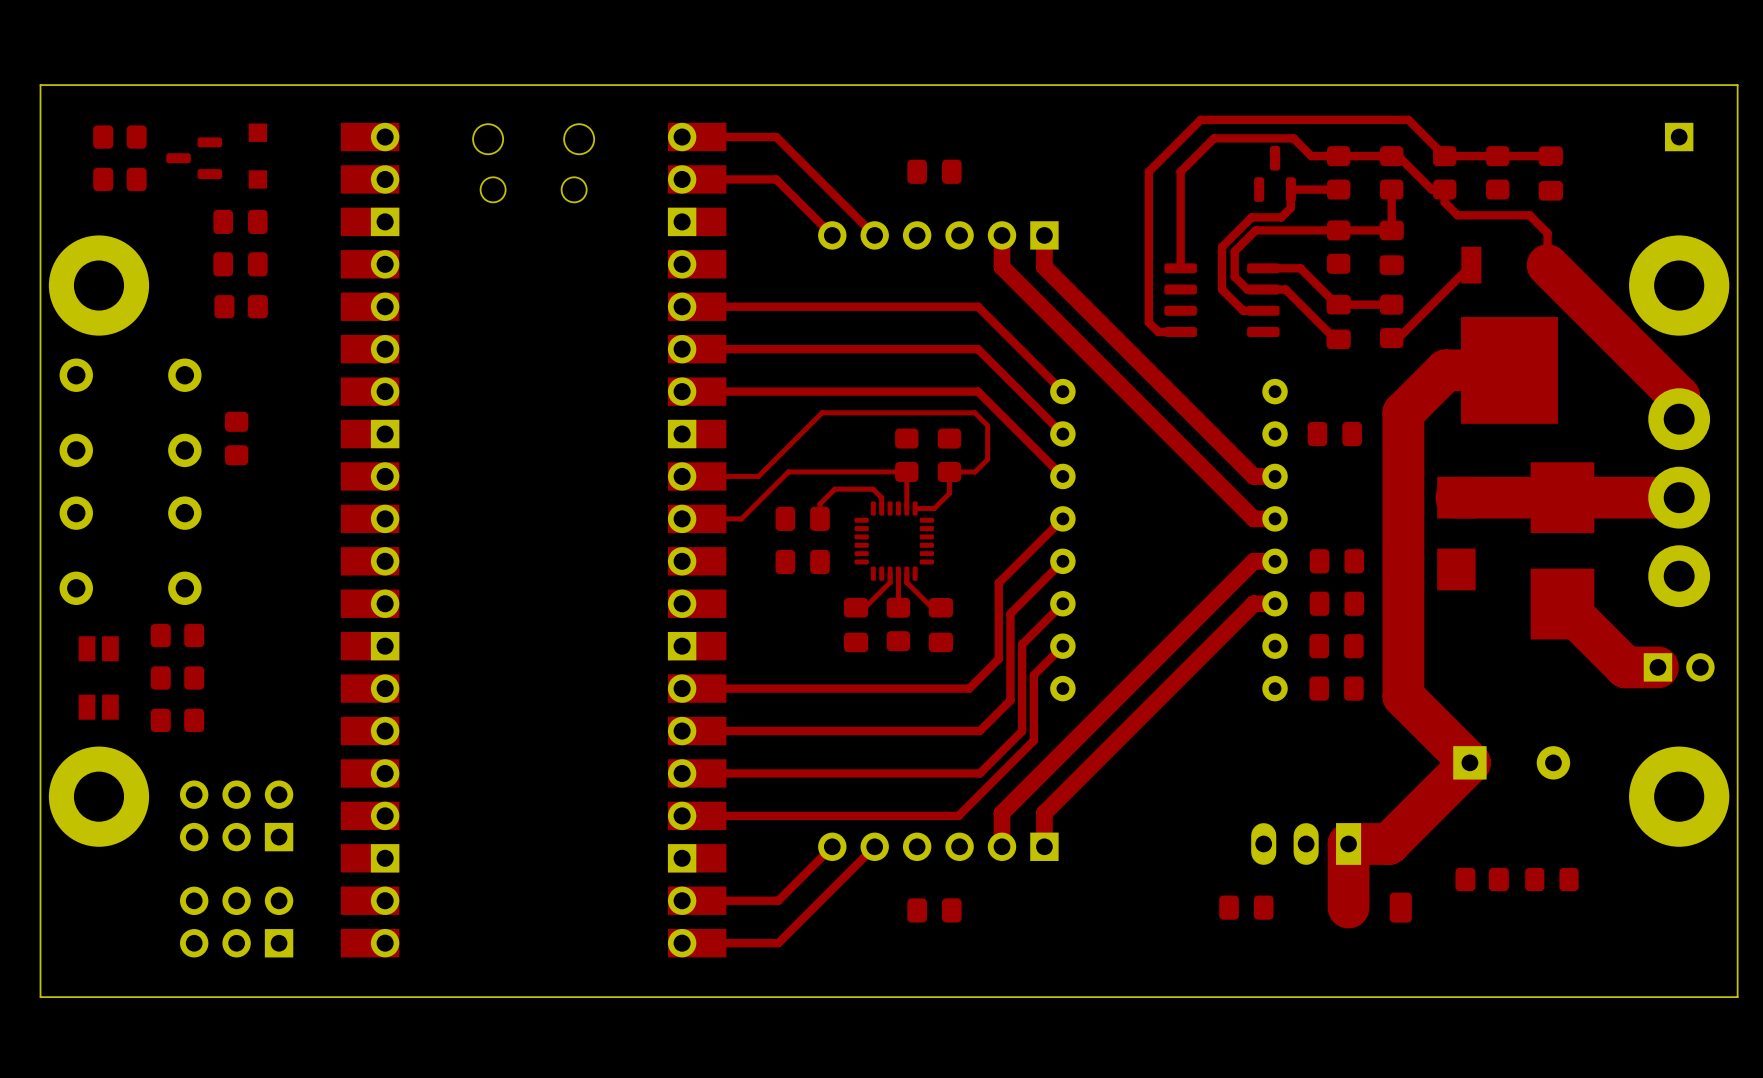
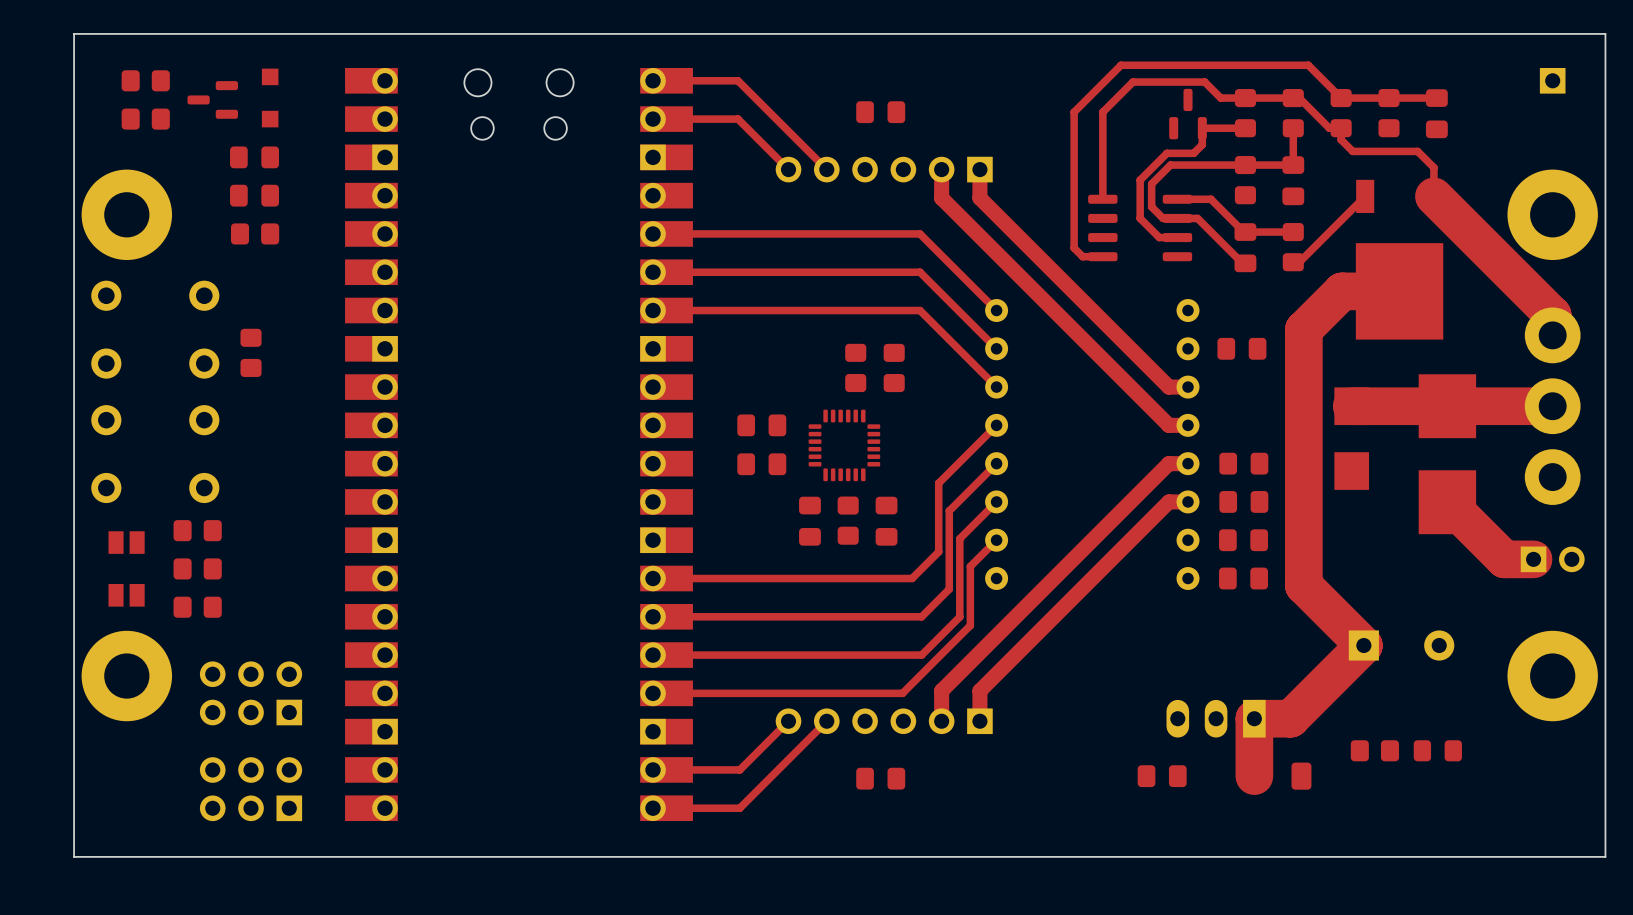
top track: (682, 476) (758, 476) (822, 412) (974, 412) (987, 425) (987, 459) (975, 471) (949, 471) (949, 493) (934, 508) (915, 508) -> none
top track: (881, 508) (881, 497) (873, 489) (834, 489) (820, 504) (820, 518) -> none
top track: (906, 508) (906, 471) (788, 471) (741, 518) (682, 518) -> none
top track: (890, 573) (890, 582) (864, 607) (856, 607) -> none
top track: (898, 573) (898, 607) -> none
top track: (906, 573) (906, 582) (932, 607) (940, 607) -> none

